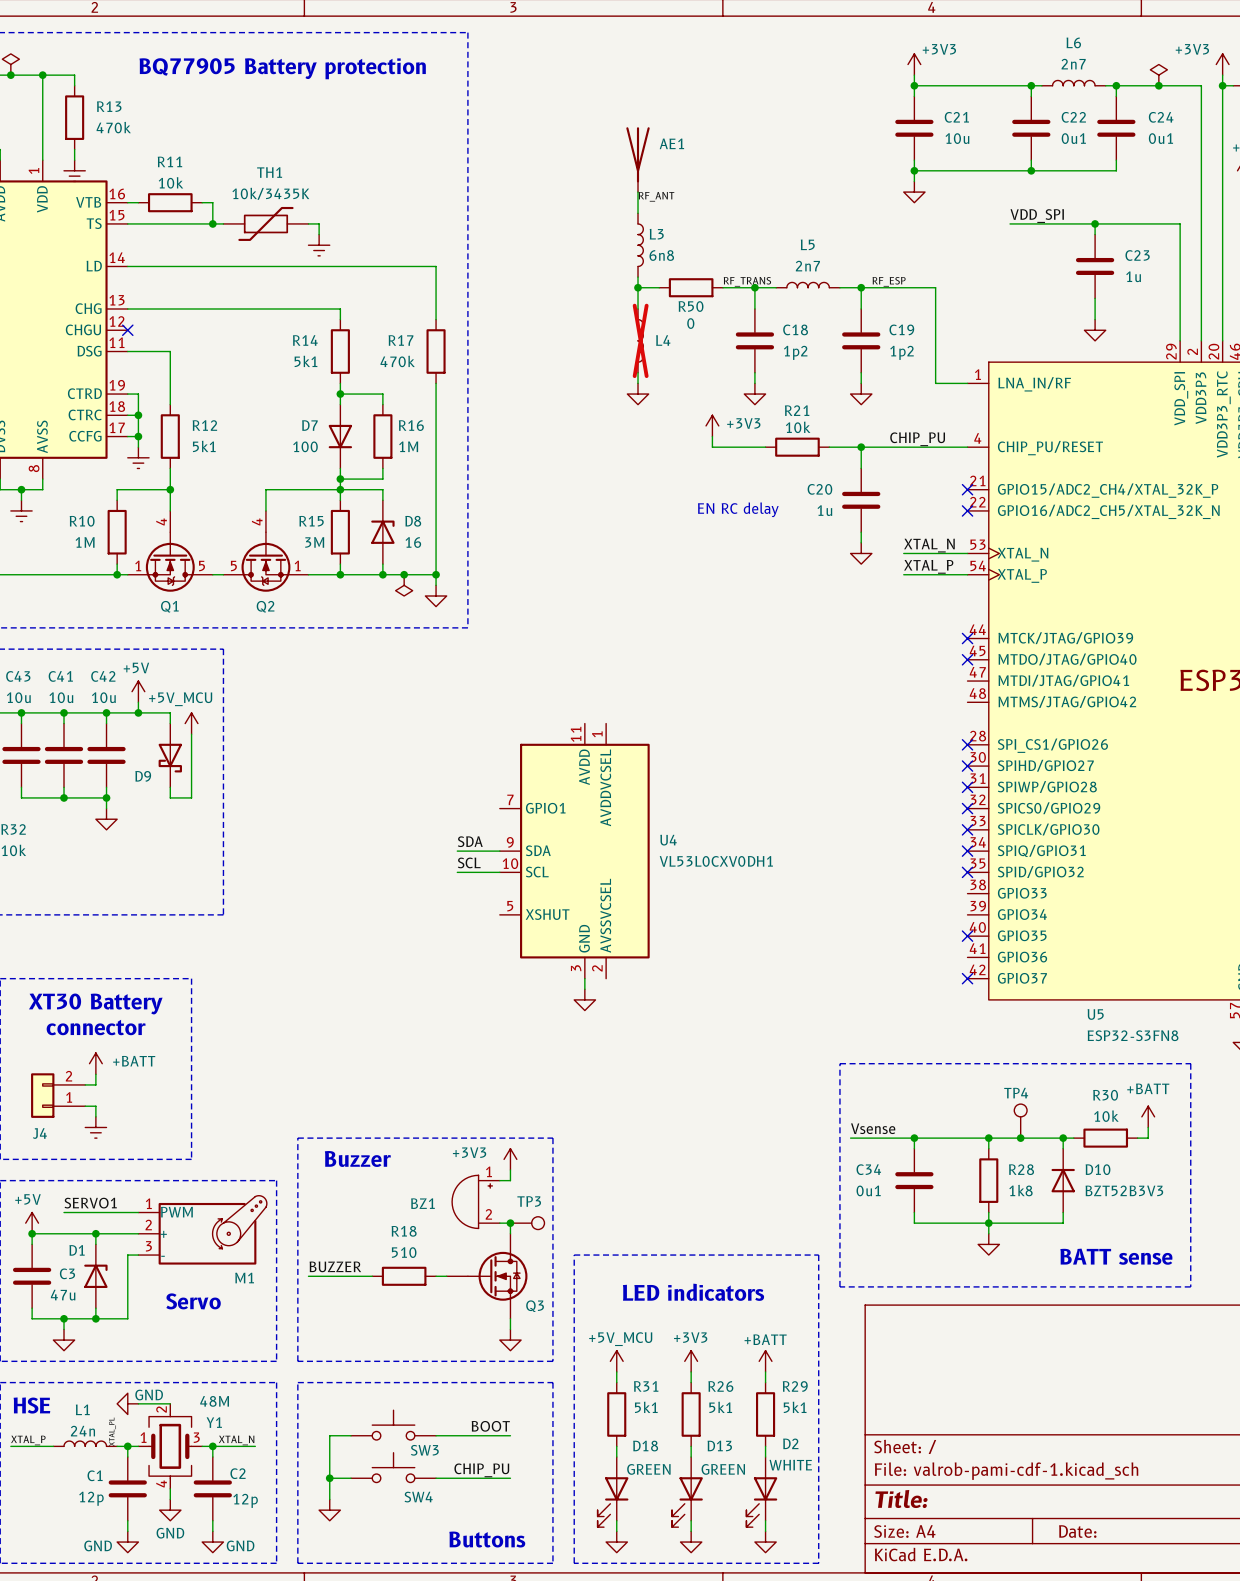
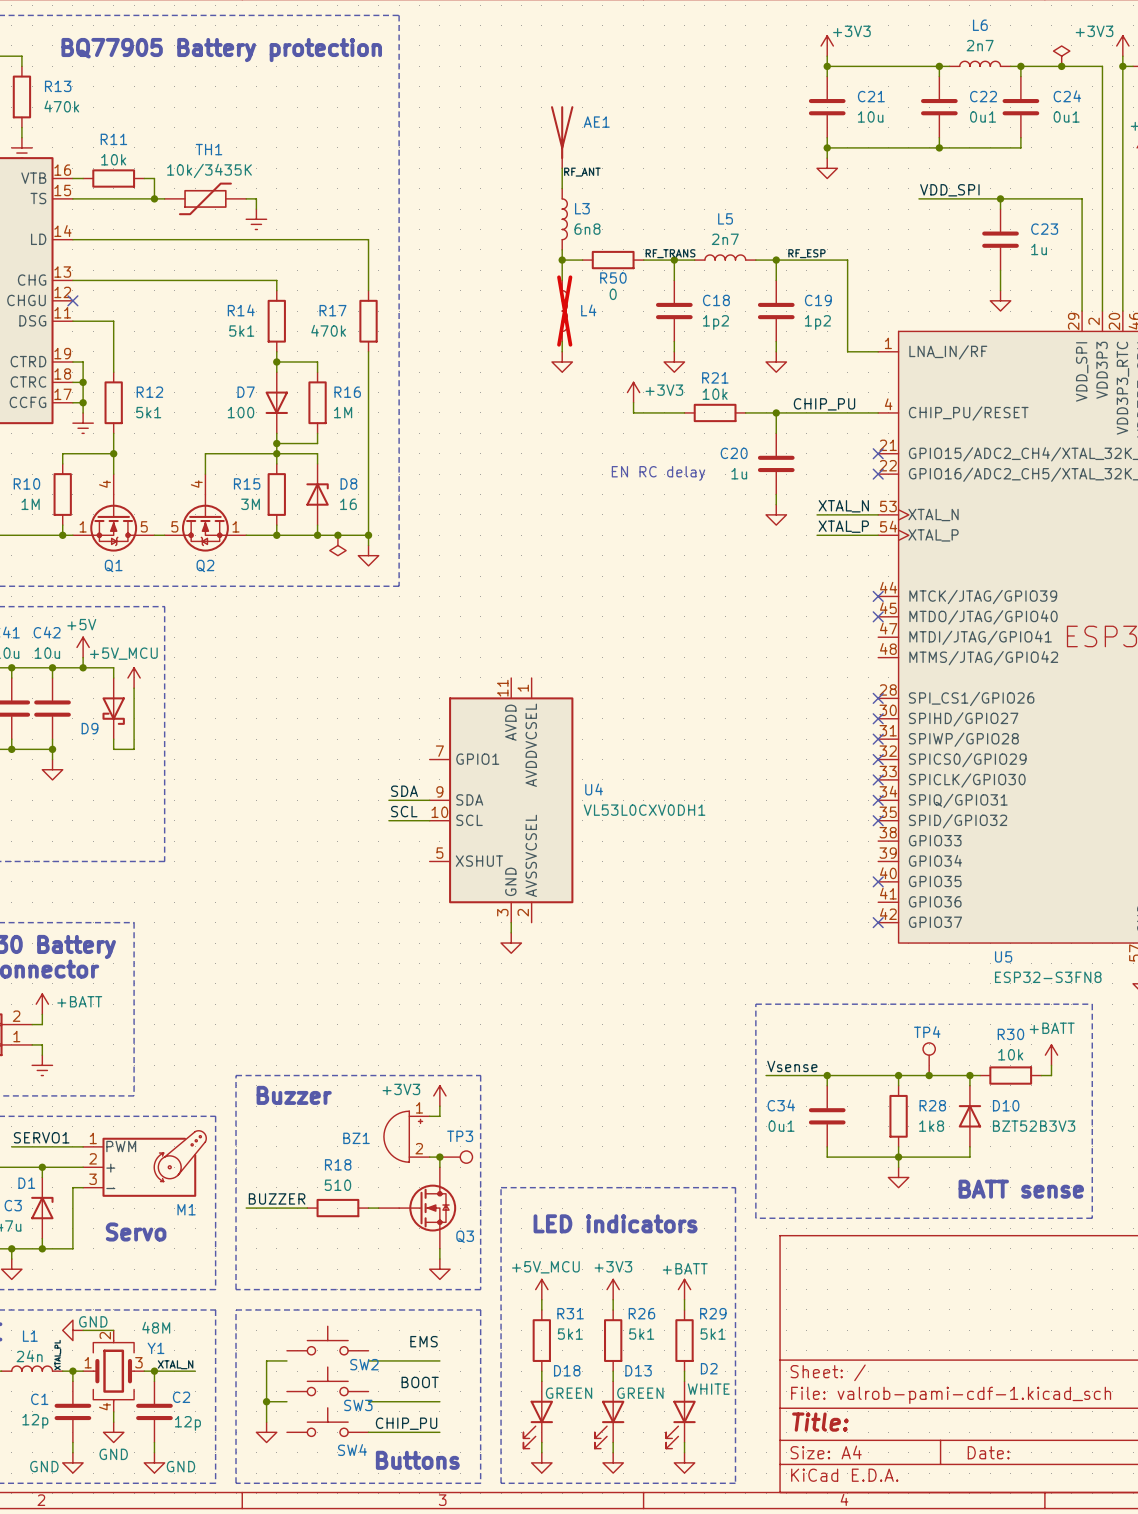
SW2: none -> (327, 1340)
label: none -> EMS (424, 1341)
SW3 position: (393, 1425) -> (327, 1381)
label position: BOOT (490, 1426) -> BOOT (420, 1382)
SW4 position: (393, 1467) -> (327, 1422)
label position: CHIP_PU (481, 1470) -> CHIP_PU (406, 1423)
wire: none -> (368, 1432) (439, 1432)

